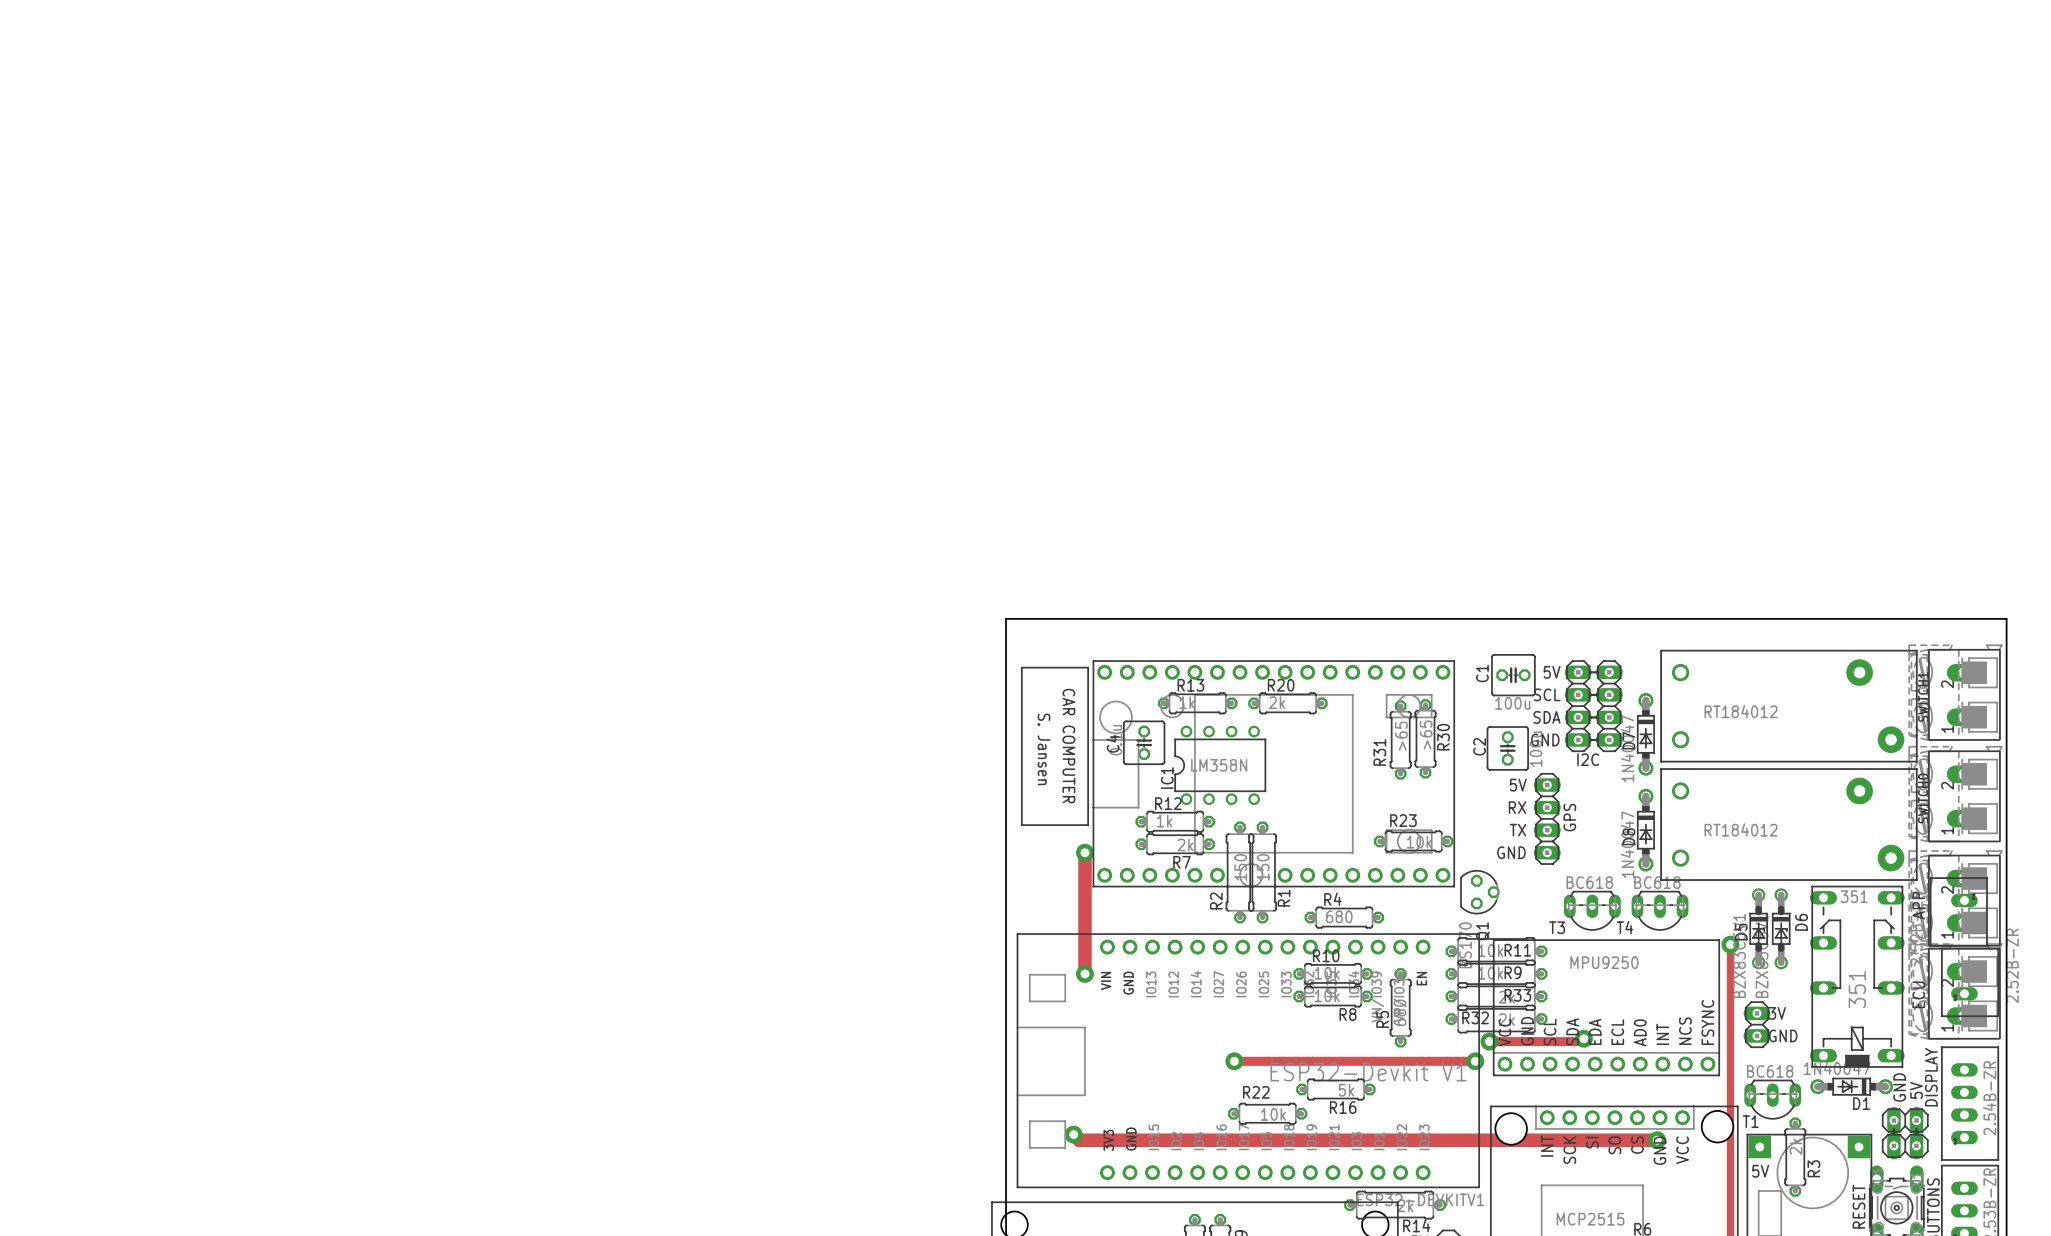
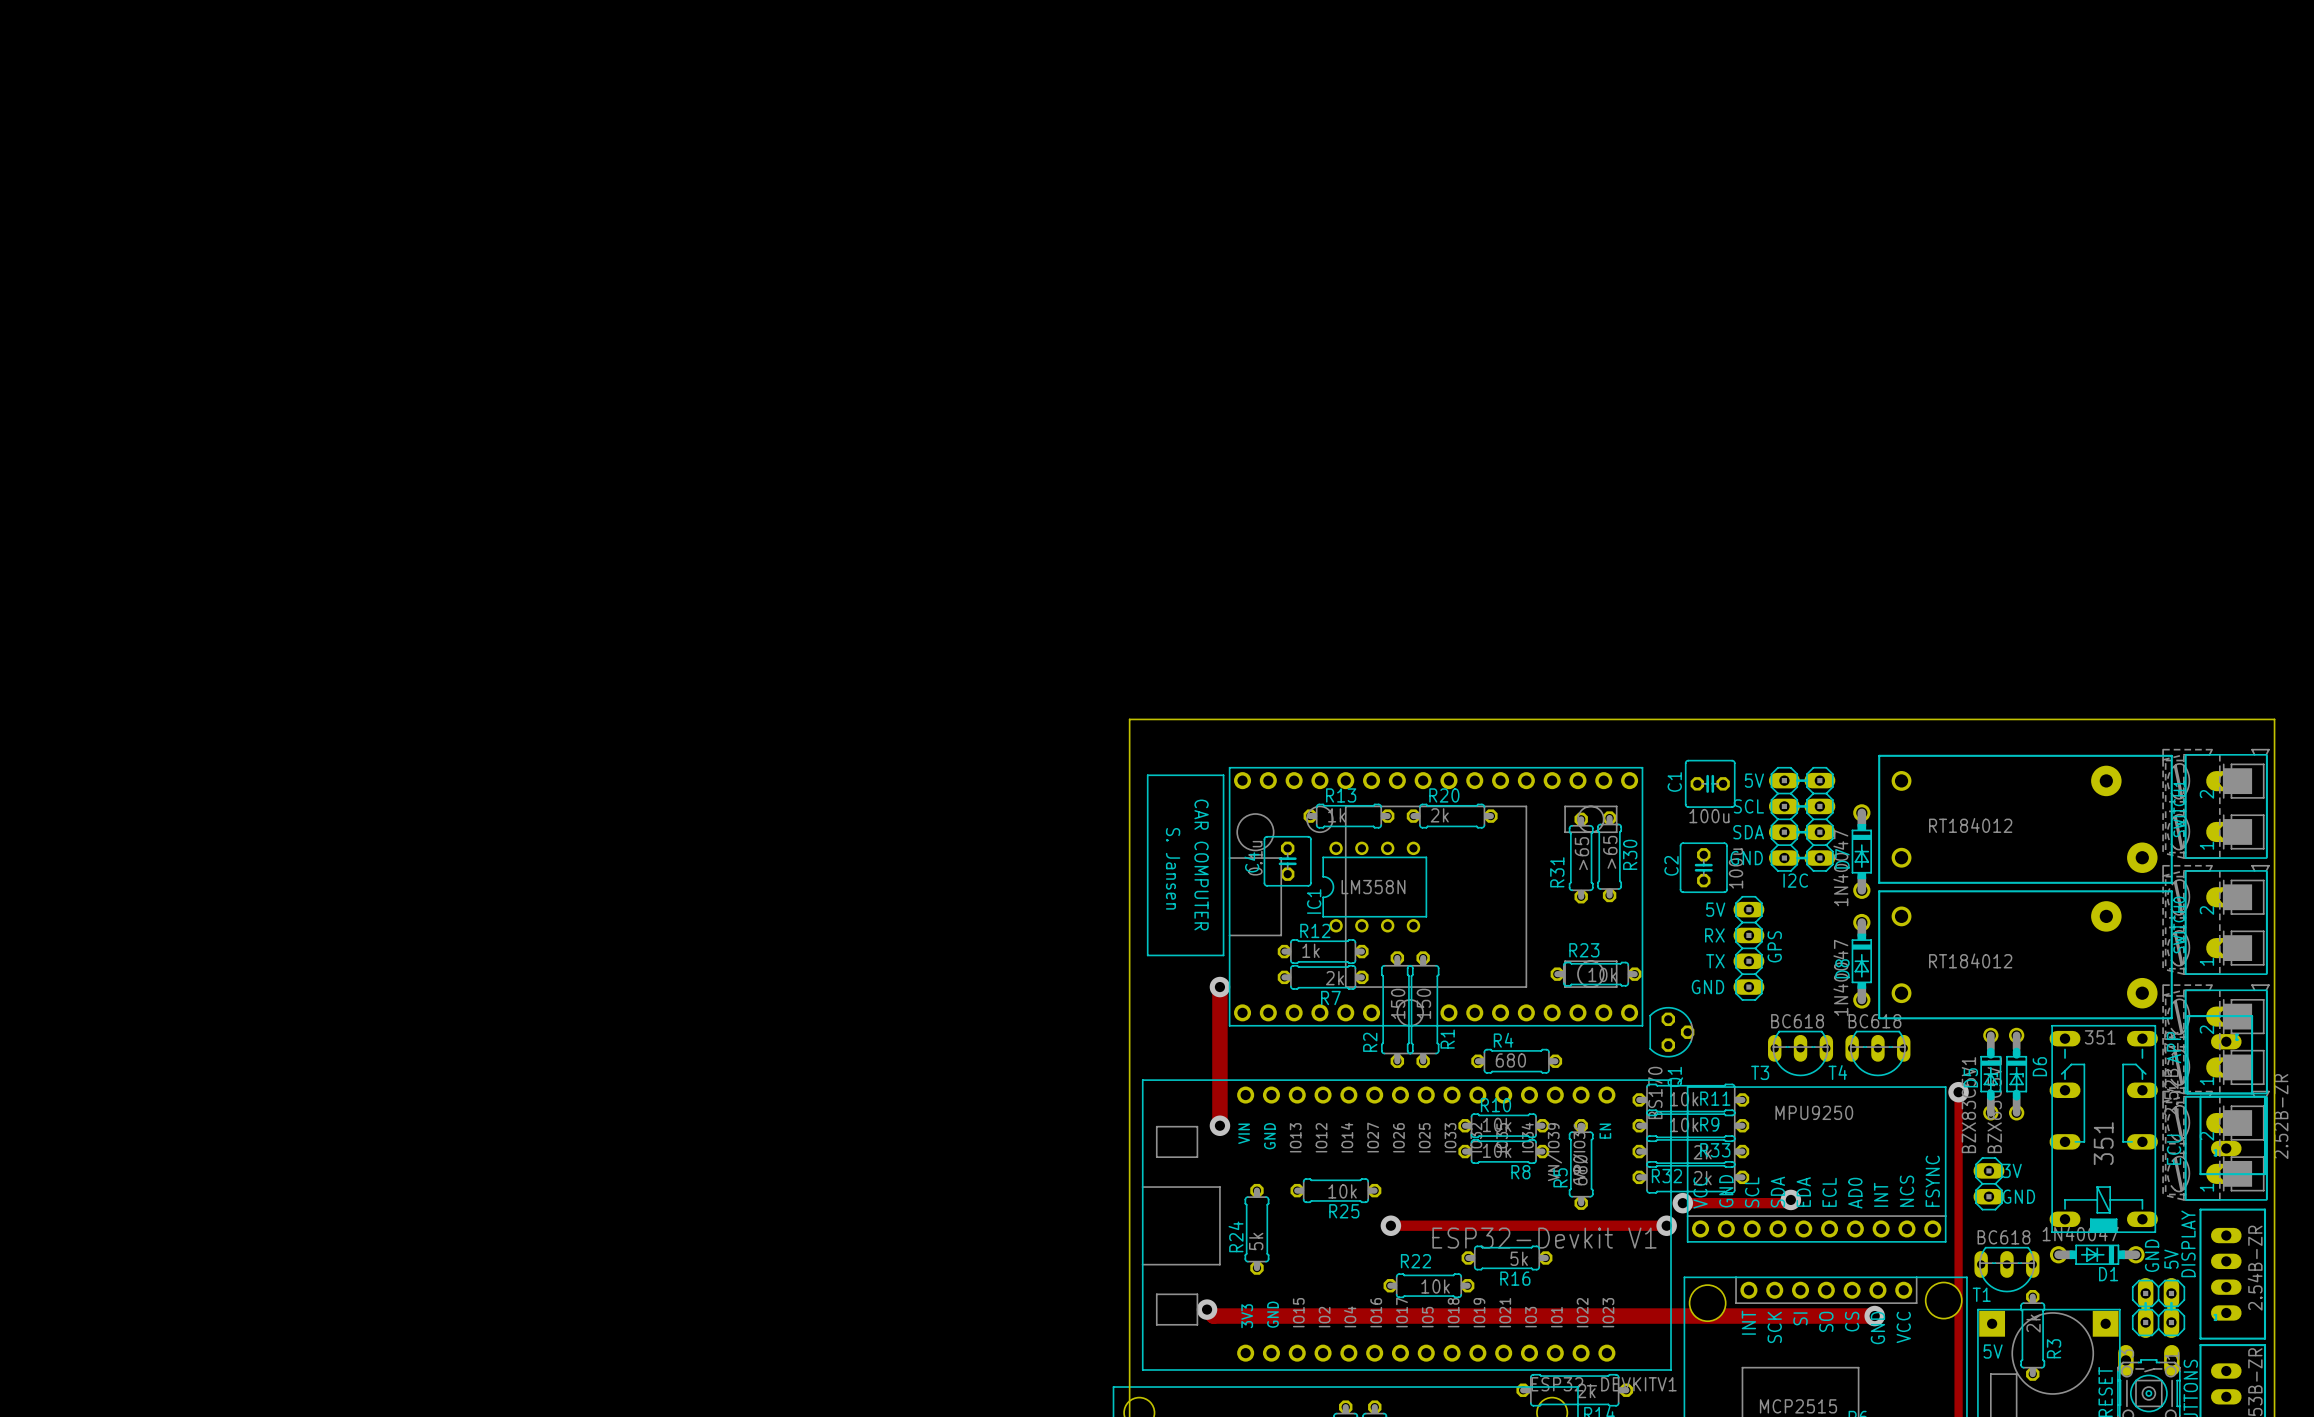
R25: none -> 10k (1335, 1190)
R24: none -> 5k (1256, 1229)

